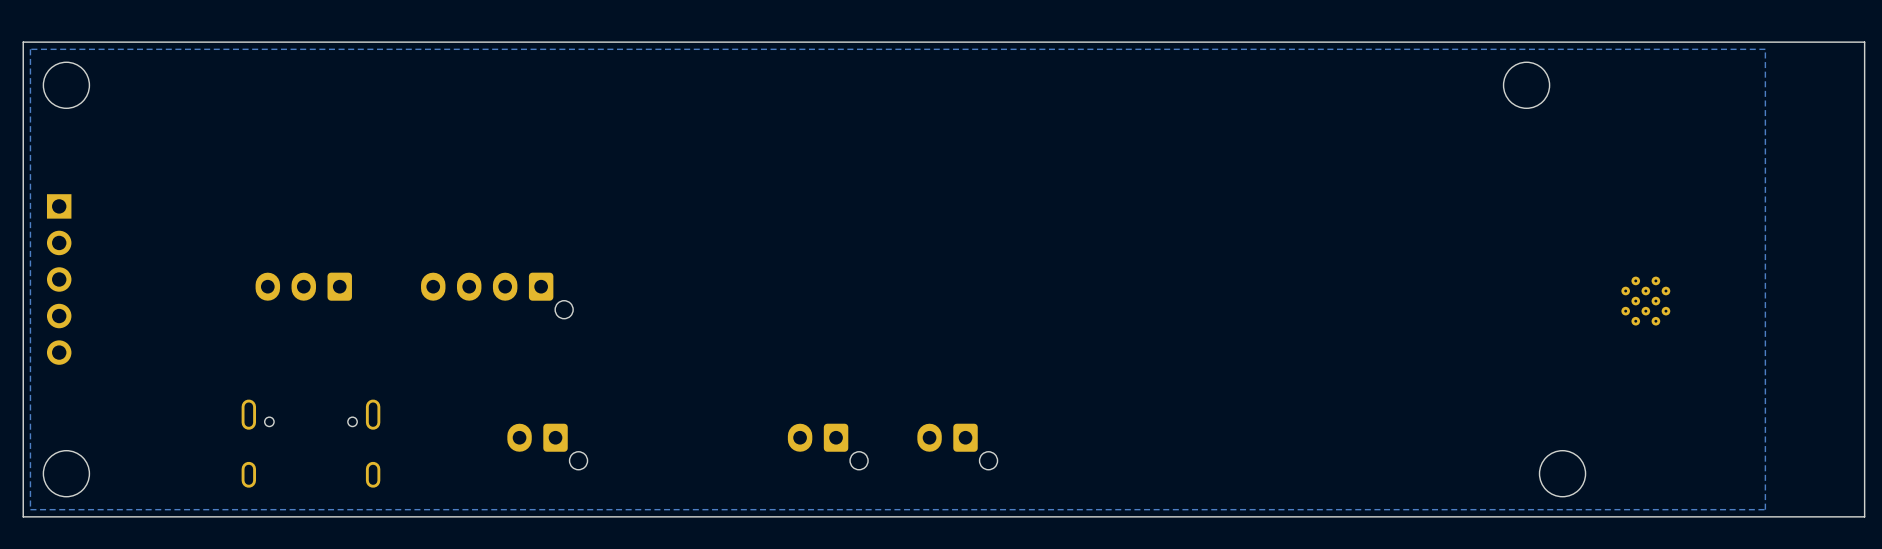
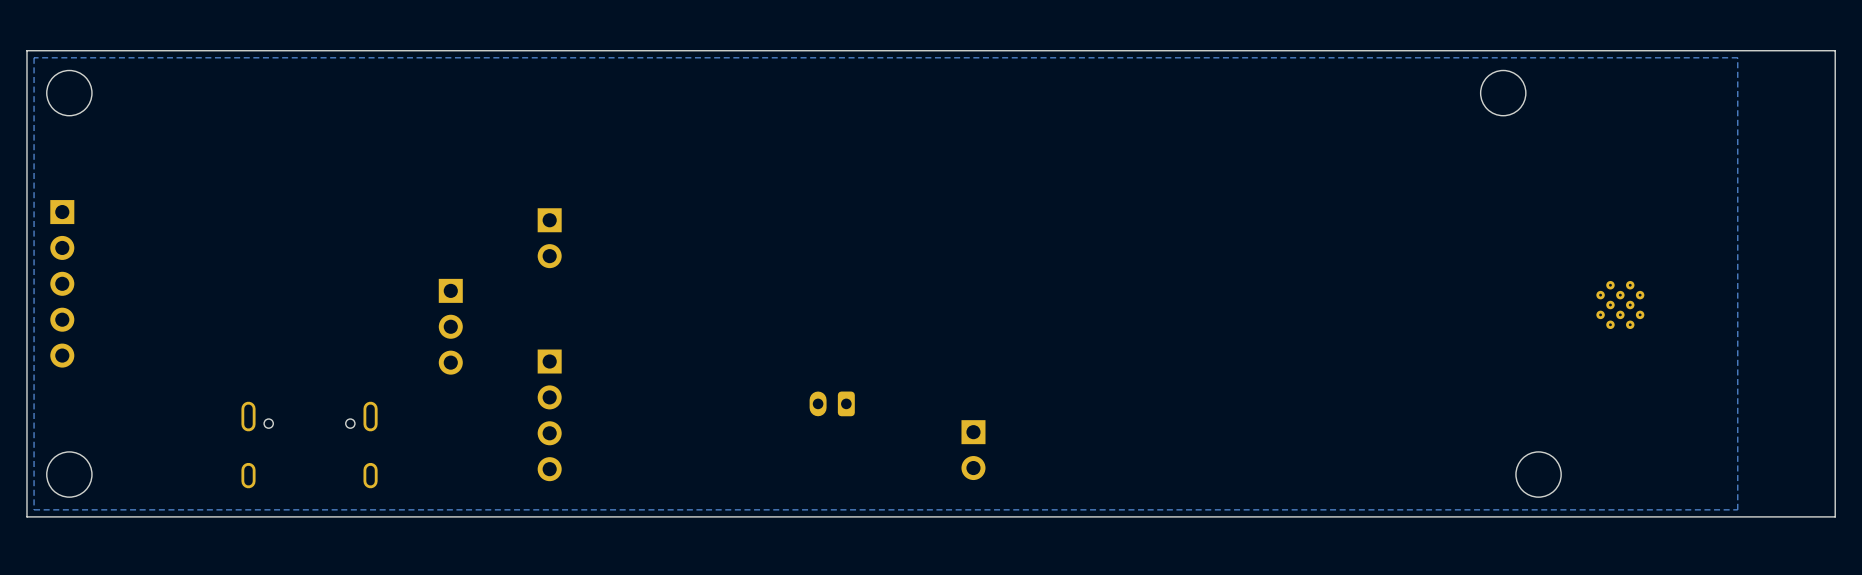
part: none -> (549, 238)
part: (303, 286) -> none
part: (497, 295) -> none
part: none -> (450, 326)
part: none -> (832, 403)
part: none -> (549, 415)
part: (547, 446) -> none
part: (827, 446) -> none
part: (957, 446) -> none
part: none -> (973, 450)

